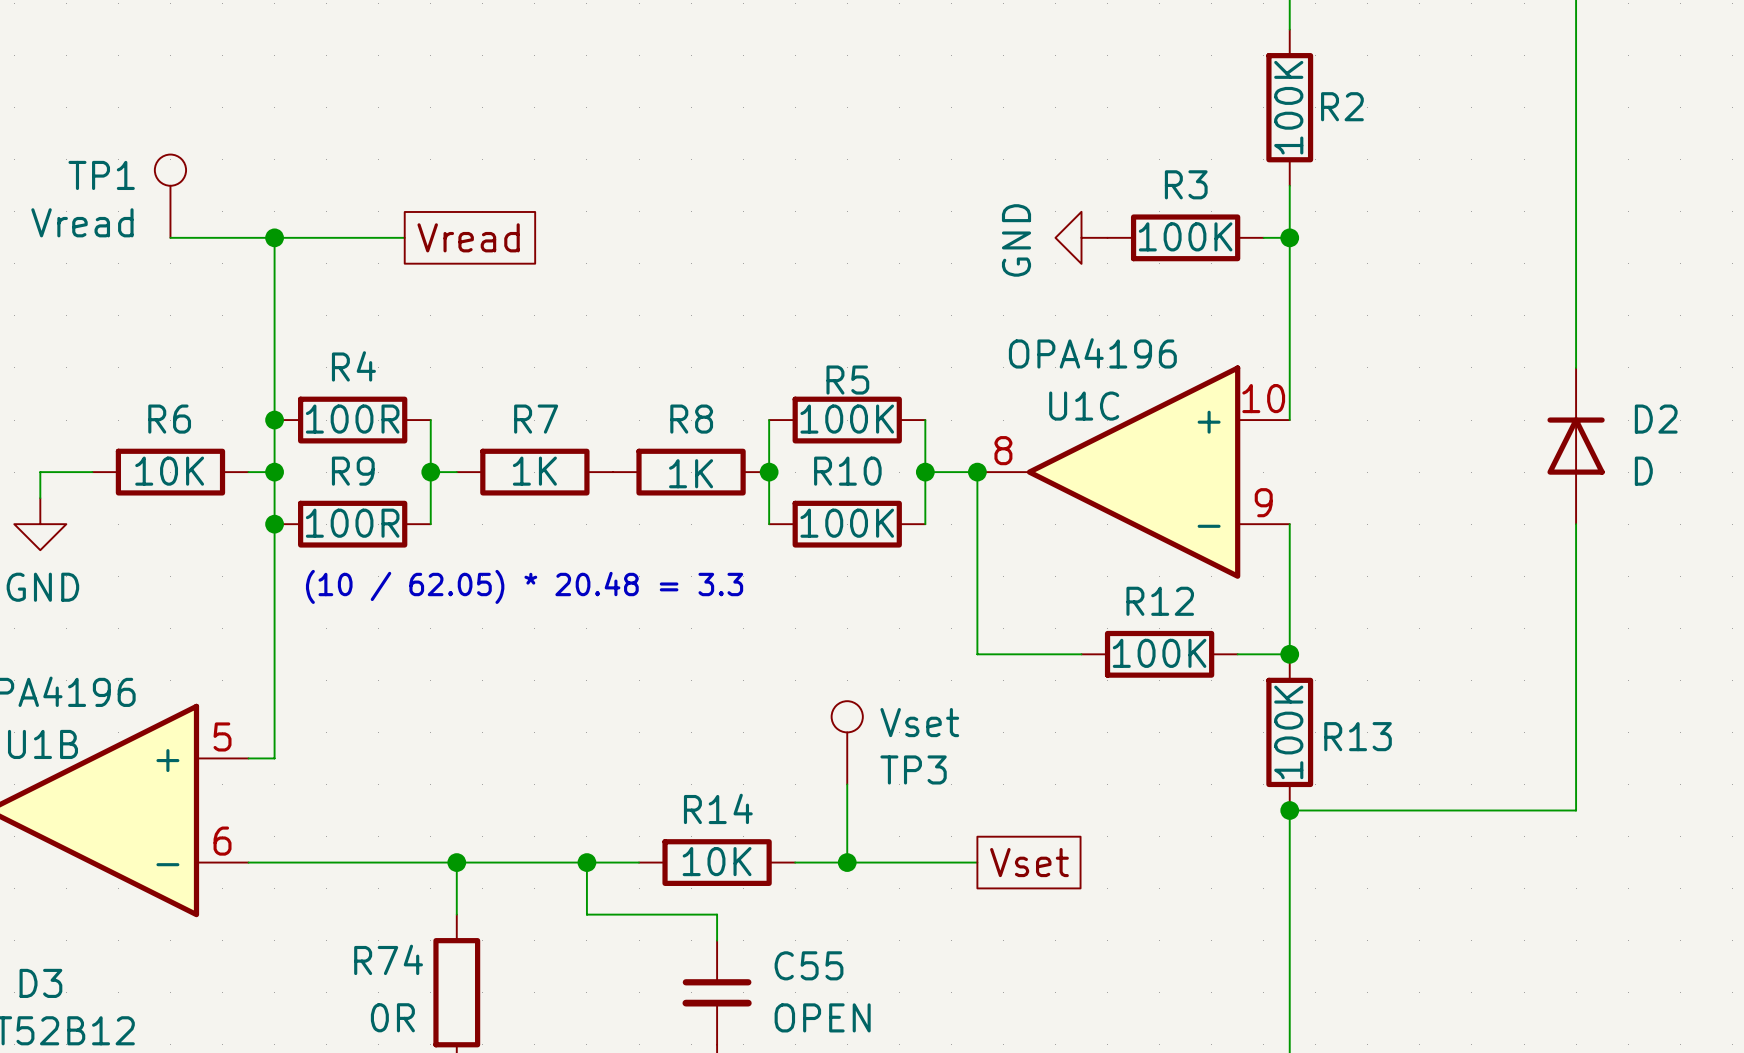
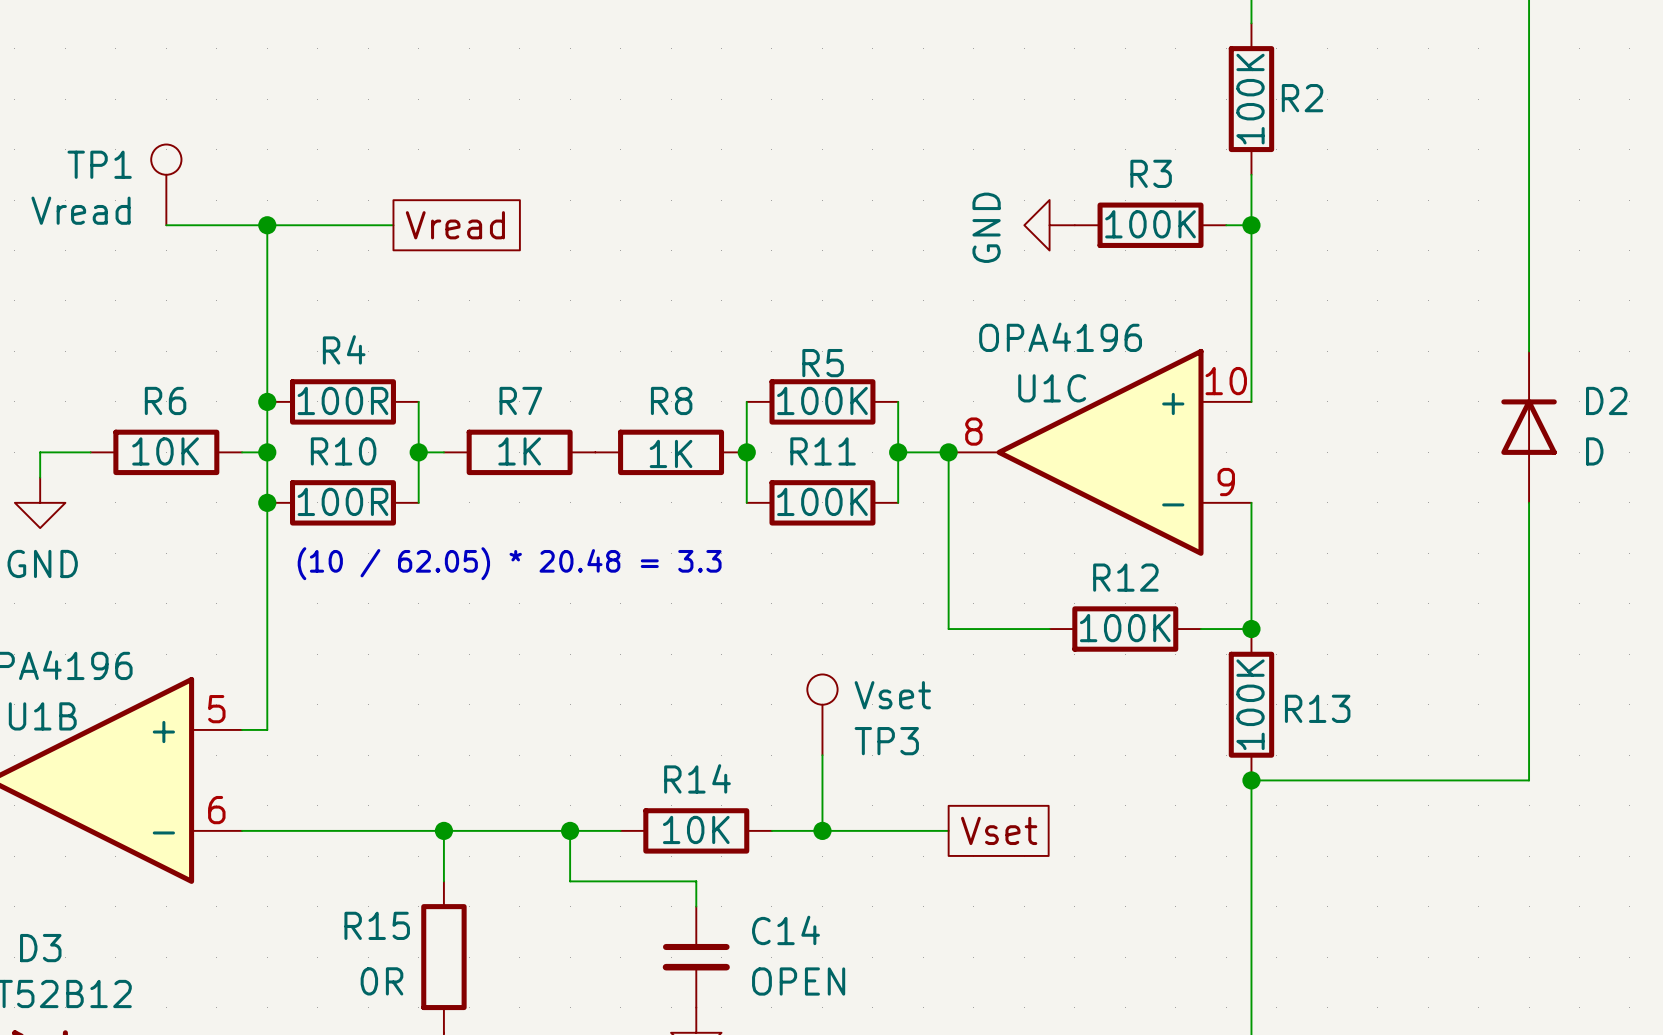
R9 name: R9 (353, 471) -> R10 (343, 451)
R10 name: R10 (847, 471) -> R11 (823, 451)
R74 name: R74 (388, 959) -> R15 (377, 925)
C55 name: C55 (809, 965) -> C14 (786, 930)

